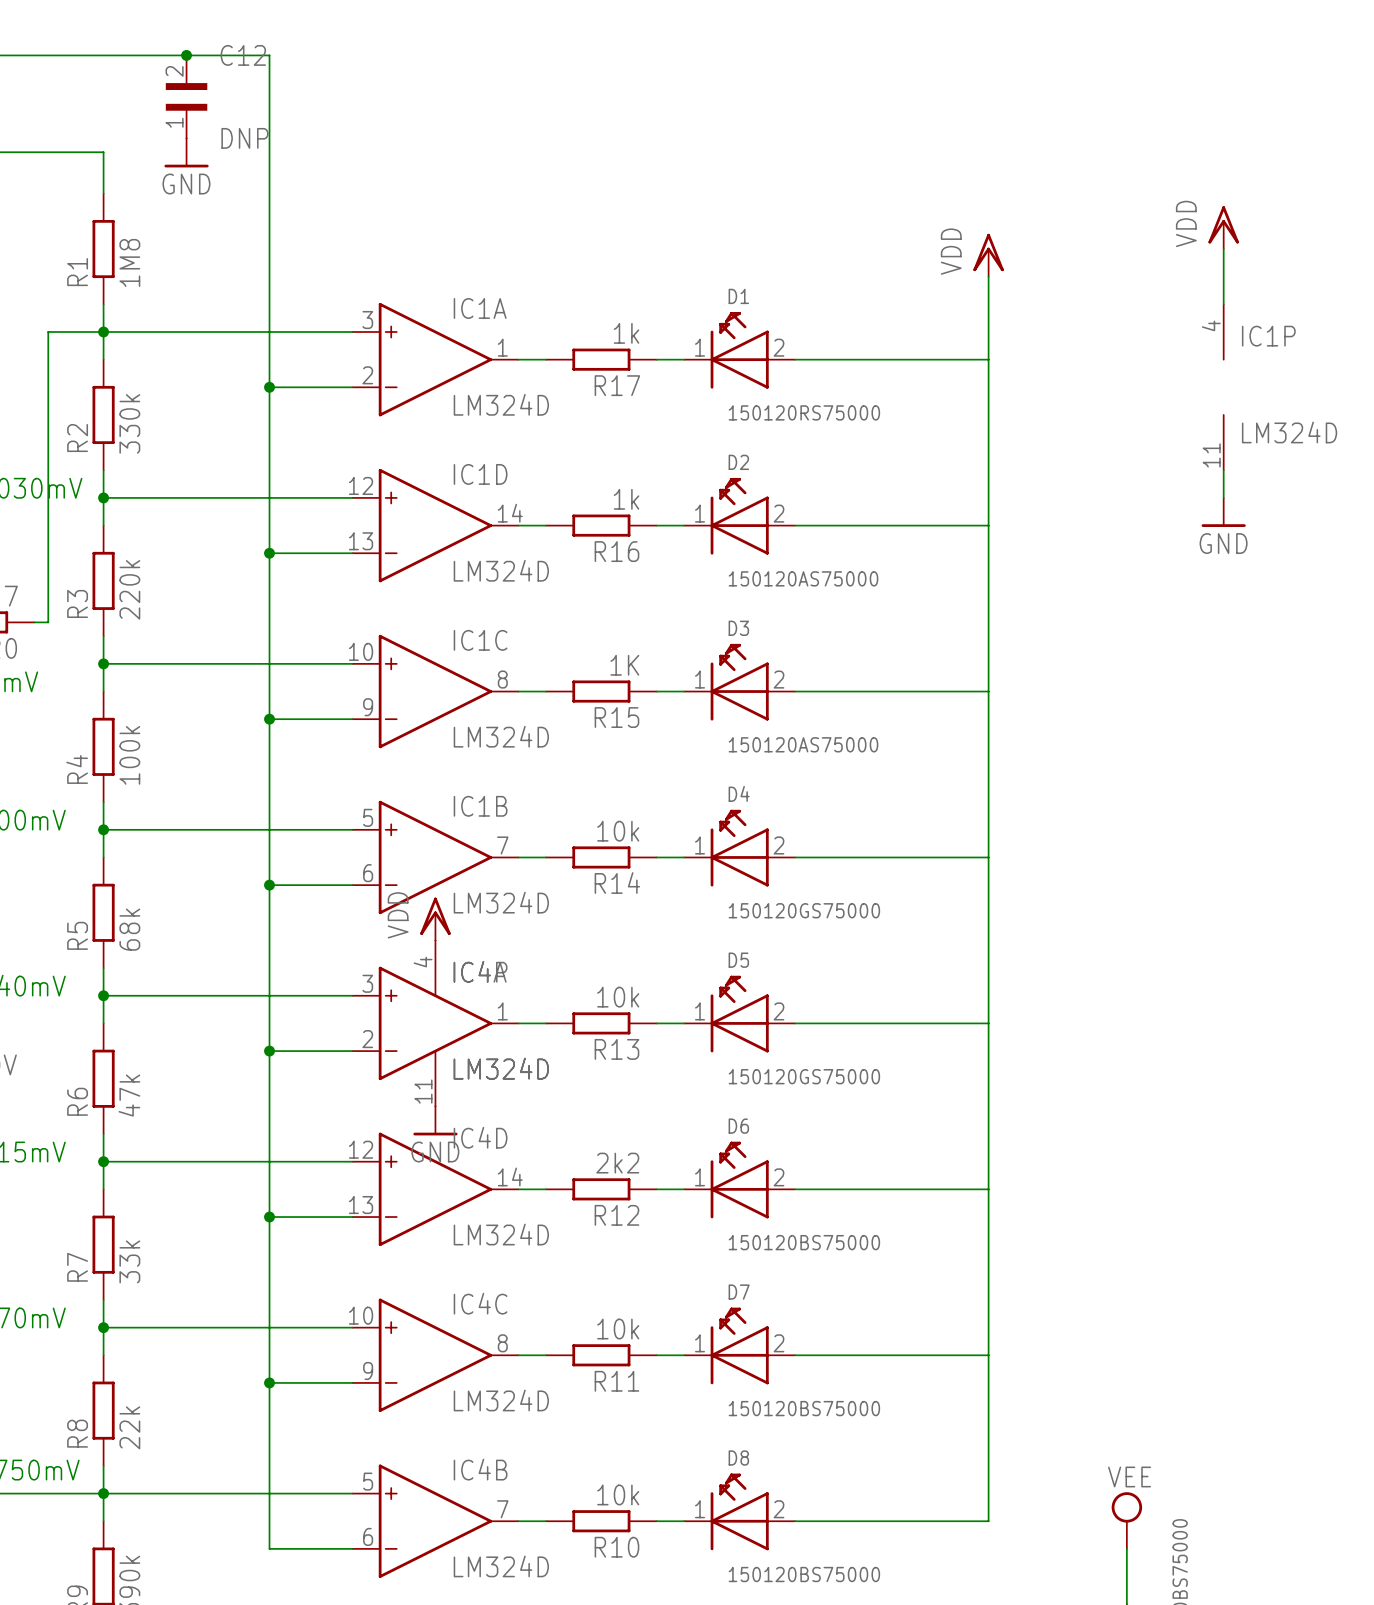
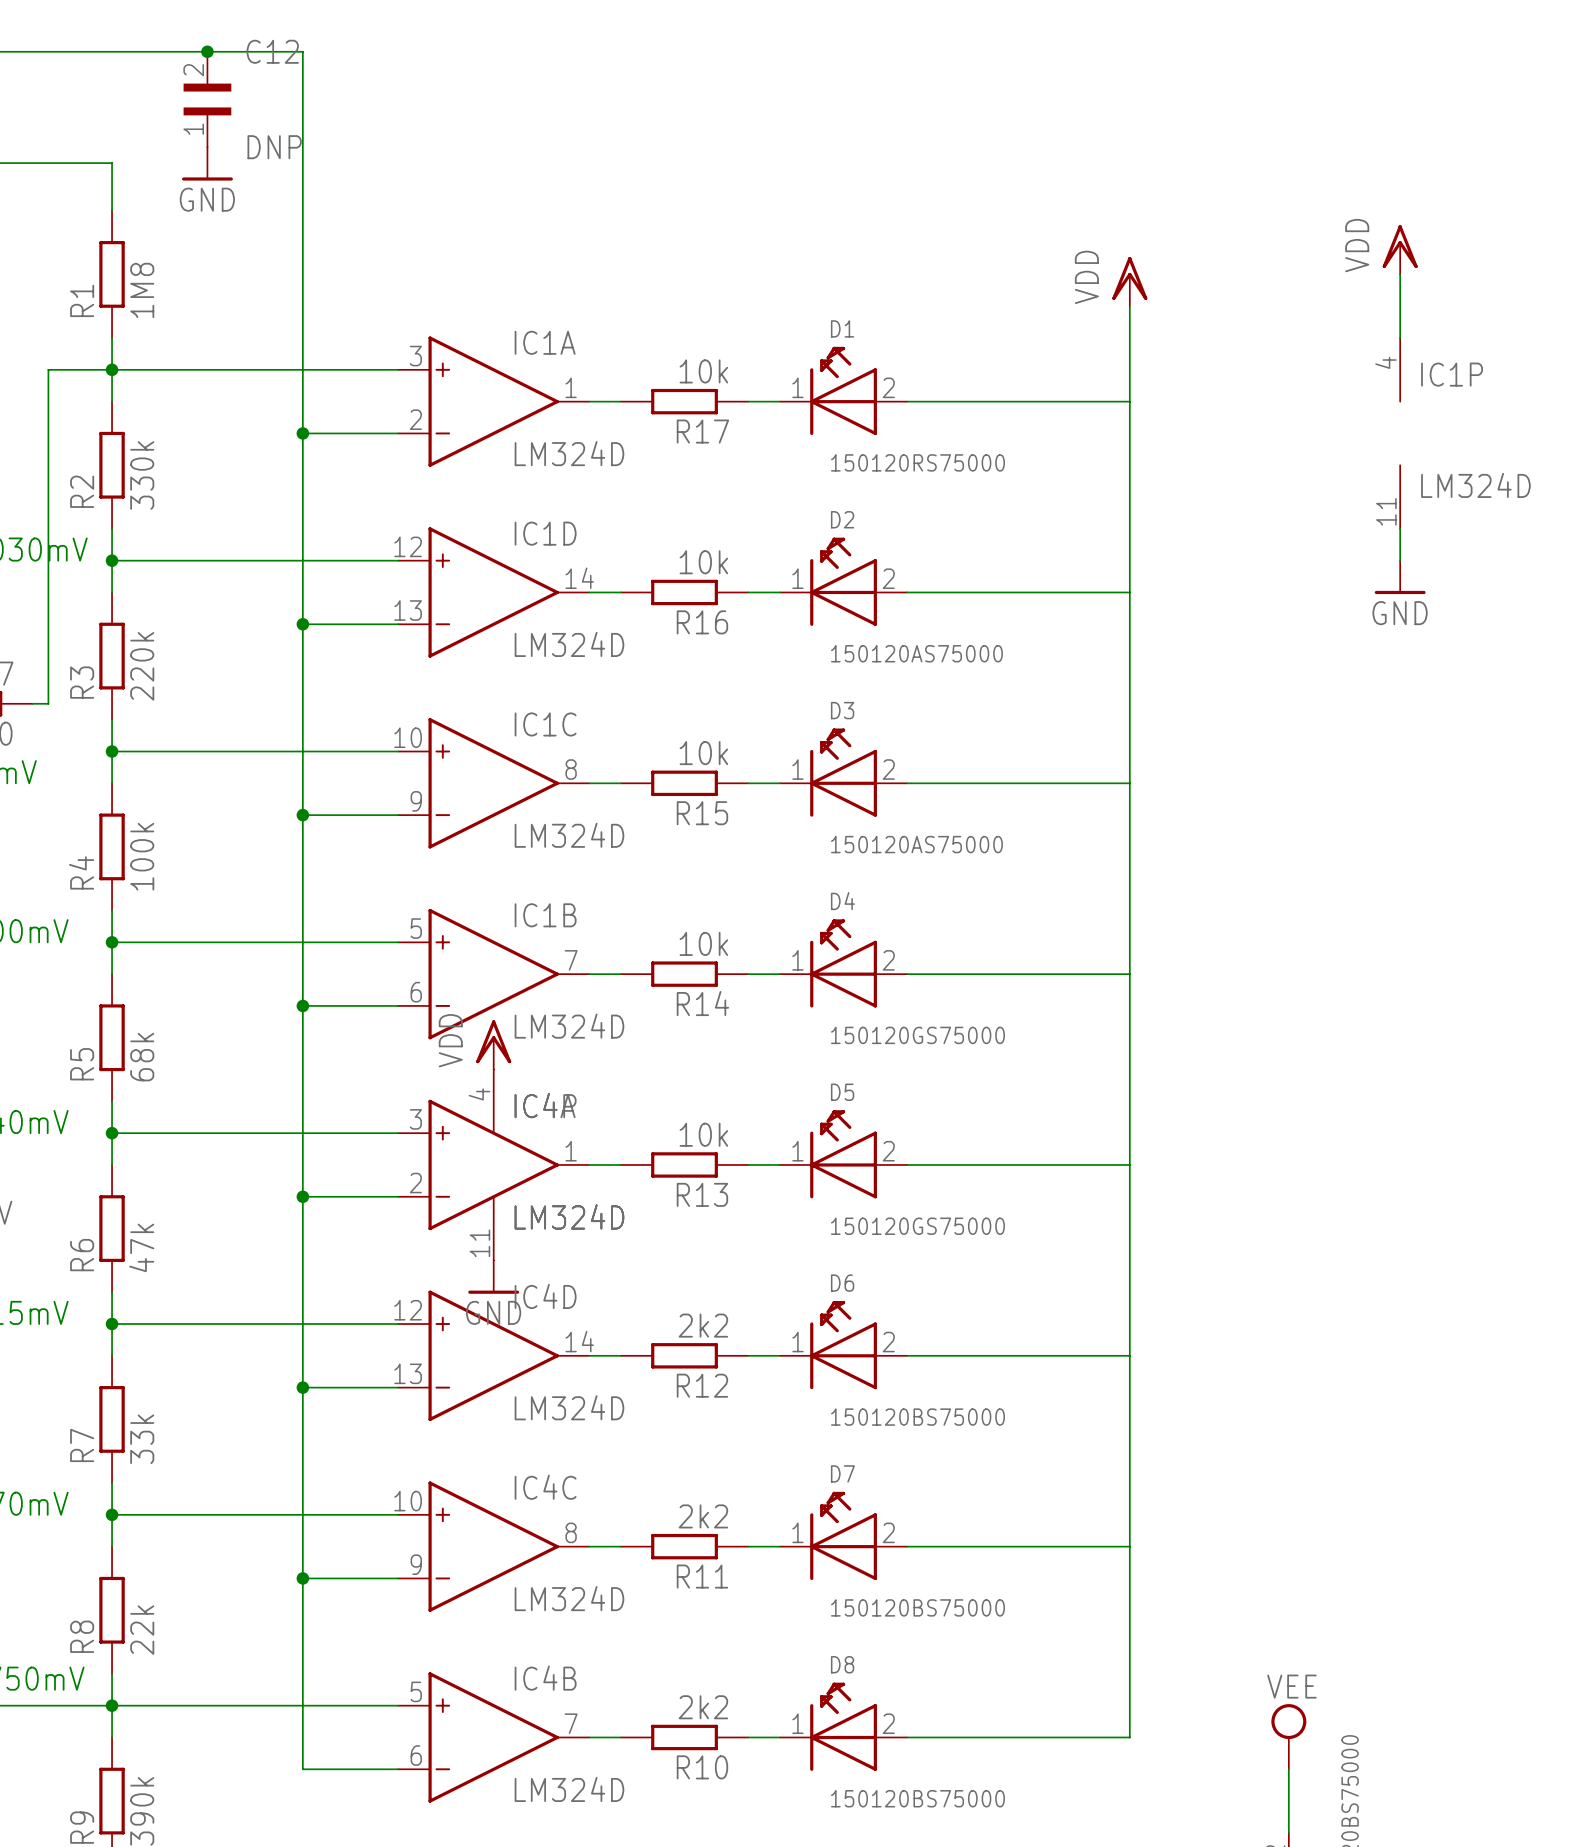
R17 value: 1k (626, 333) -> 10k (703, 371)
R16 value: 1k (626, 499) -> 10k (703, 562)
R15 value: 1K (624, 665) -> 10k (703, 753)
R11 value: 10k (618, 1329) -> 2k2 (703, 1516)
R10 value: 10k (618, 1494) -> 2k2 (703, 1707)

